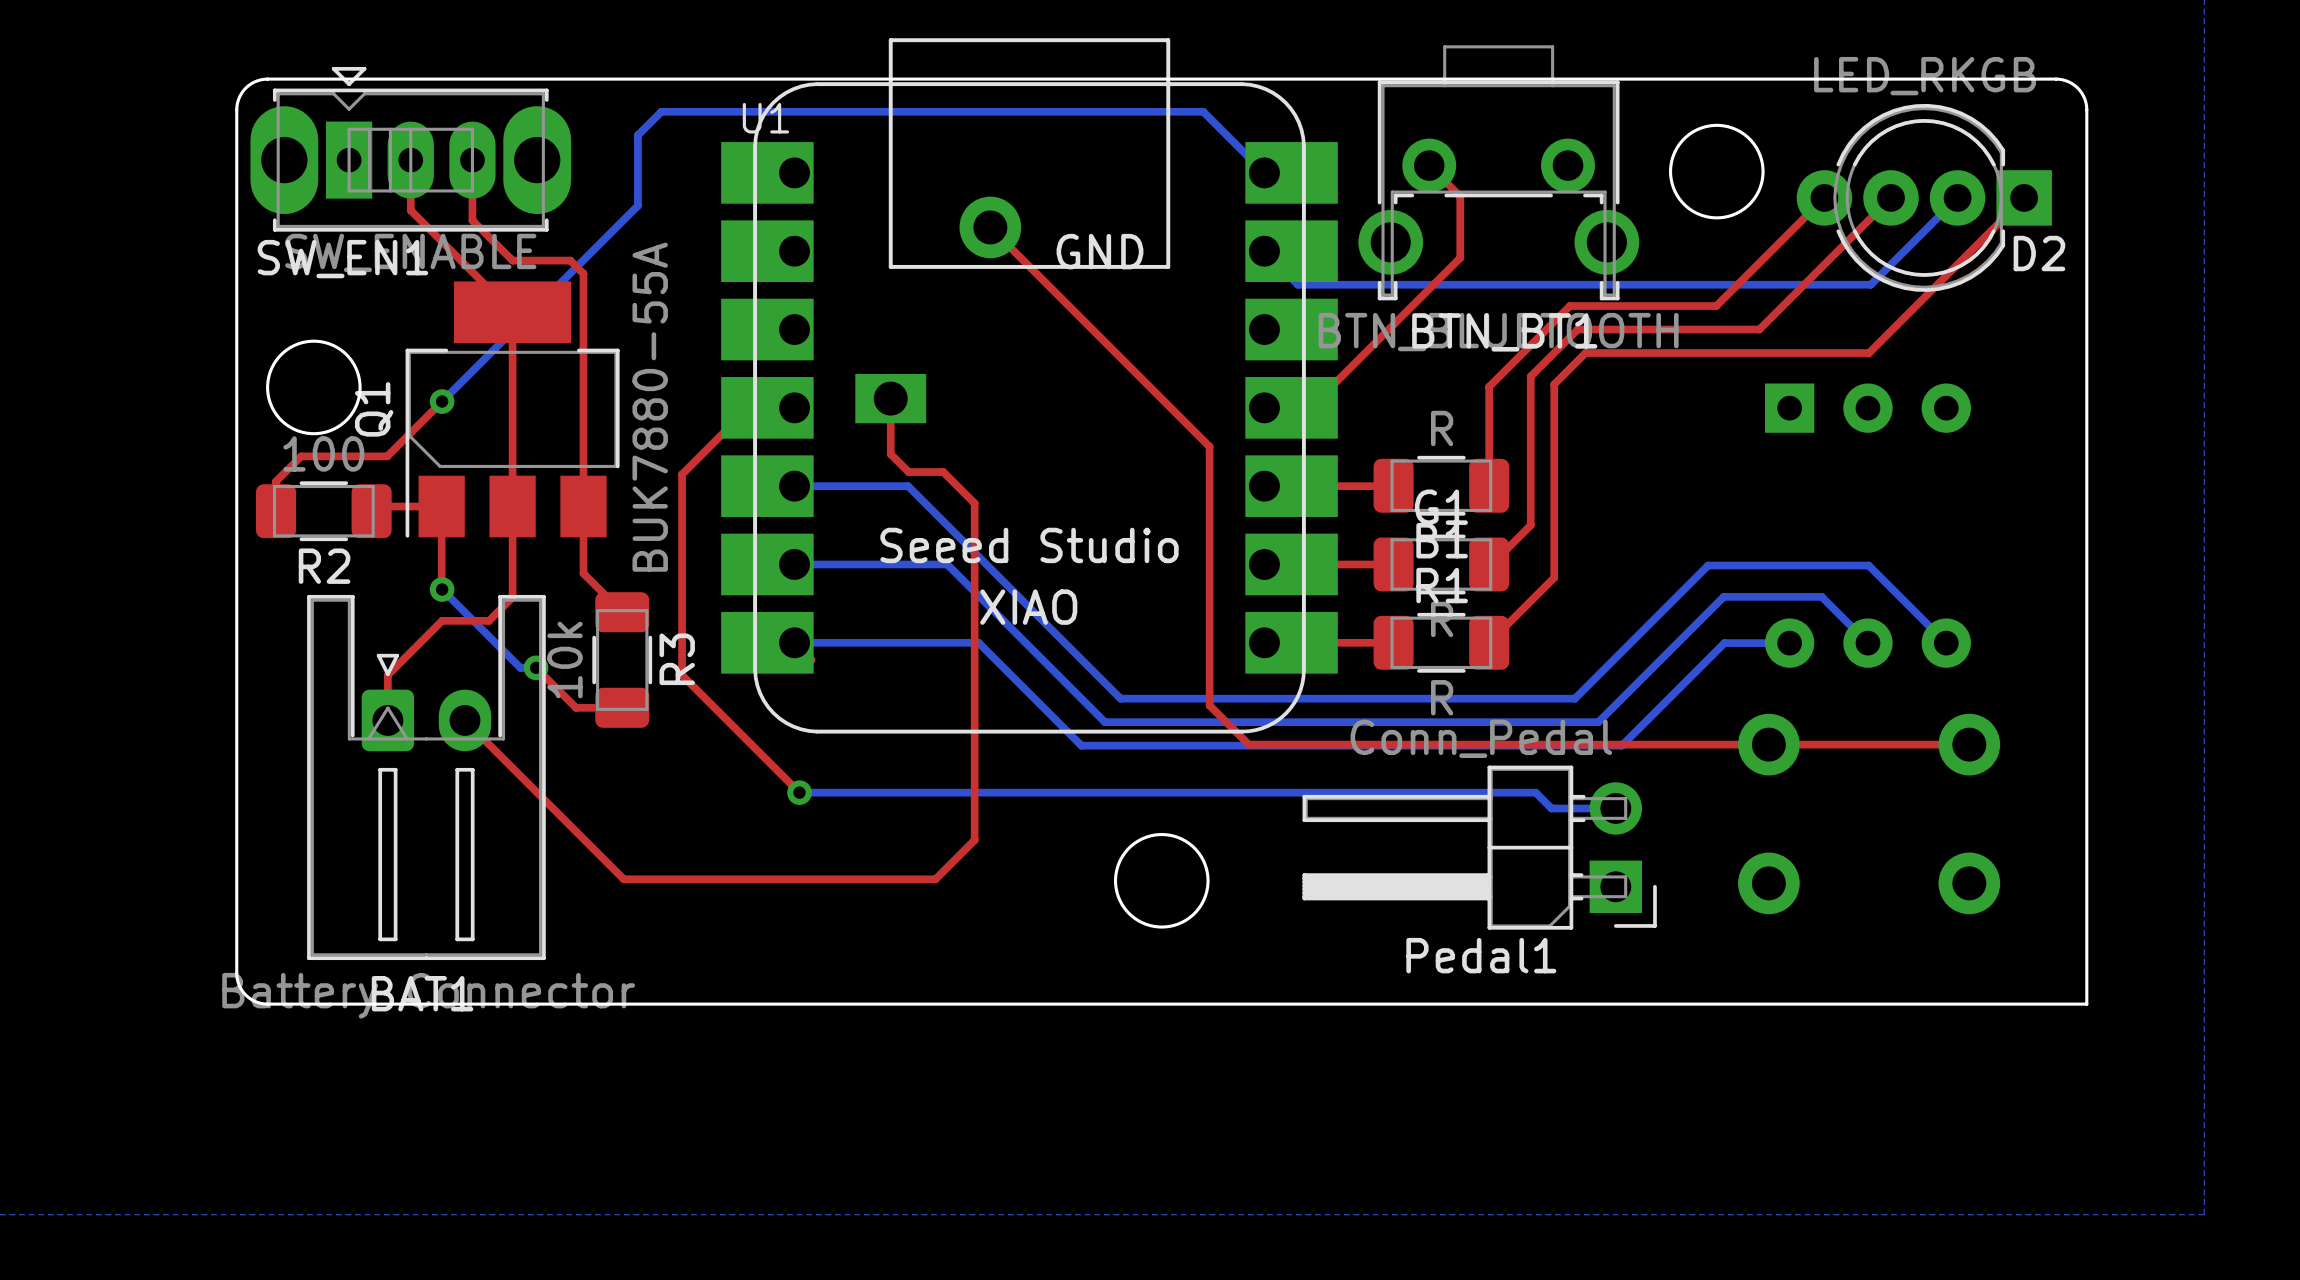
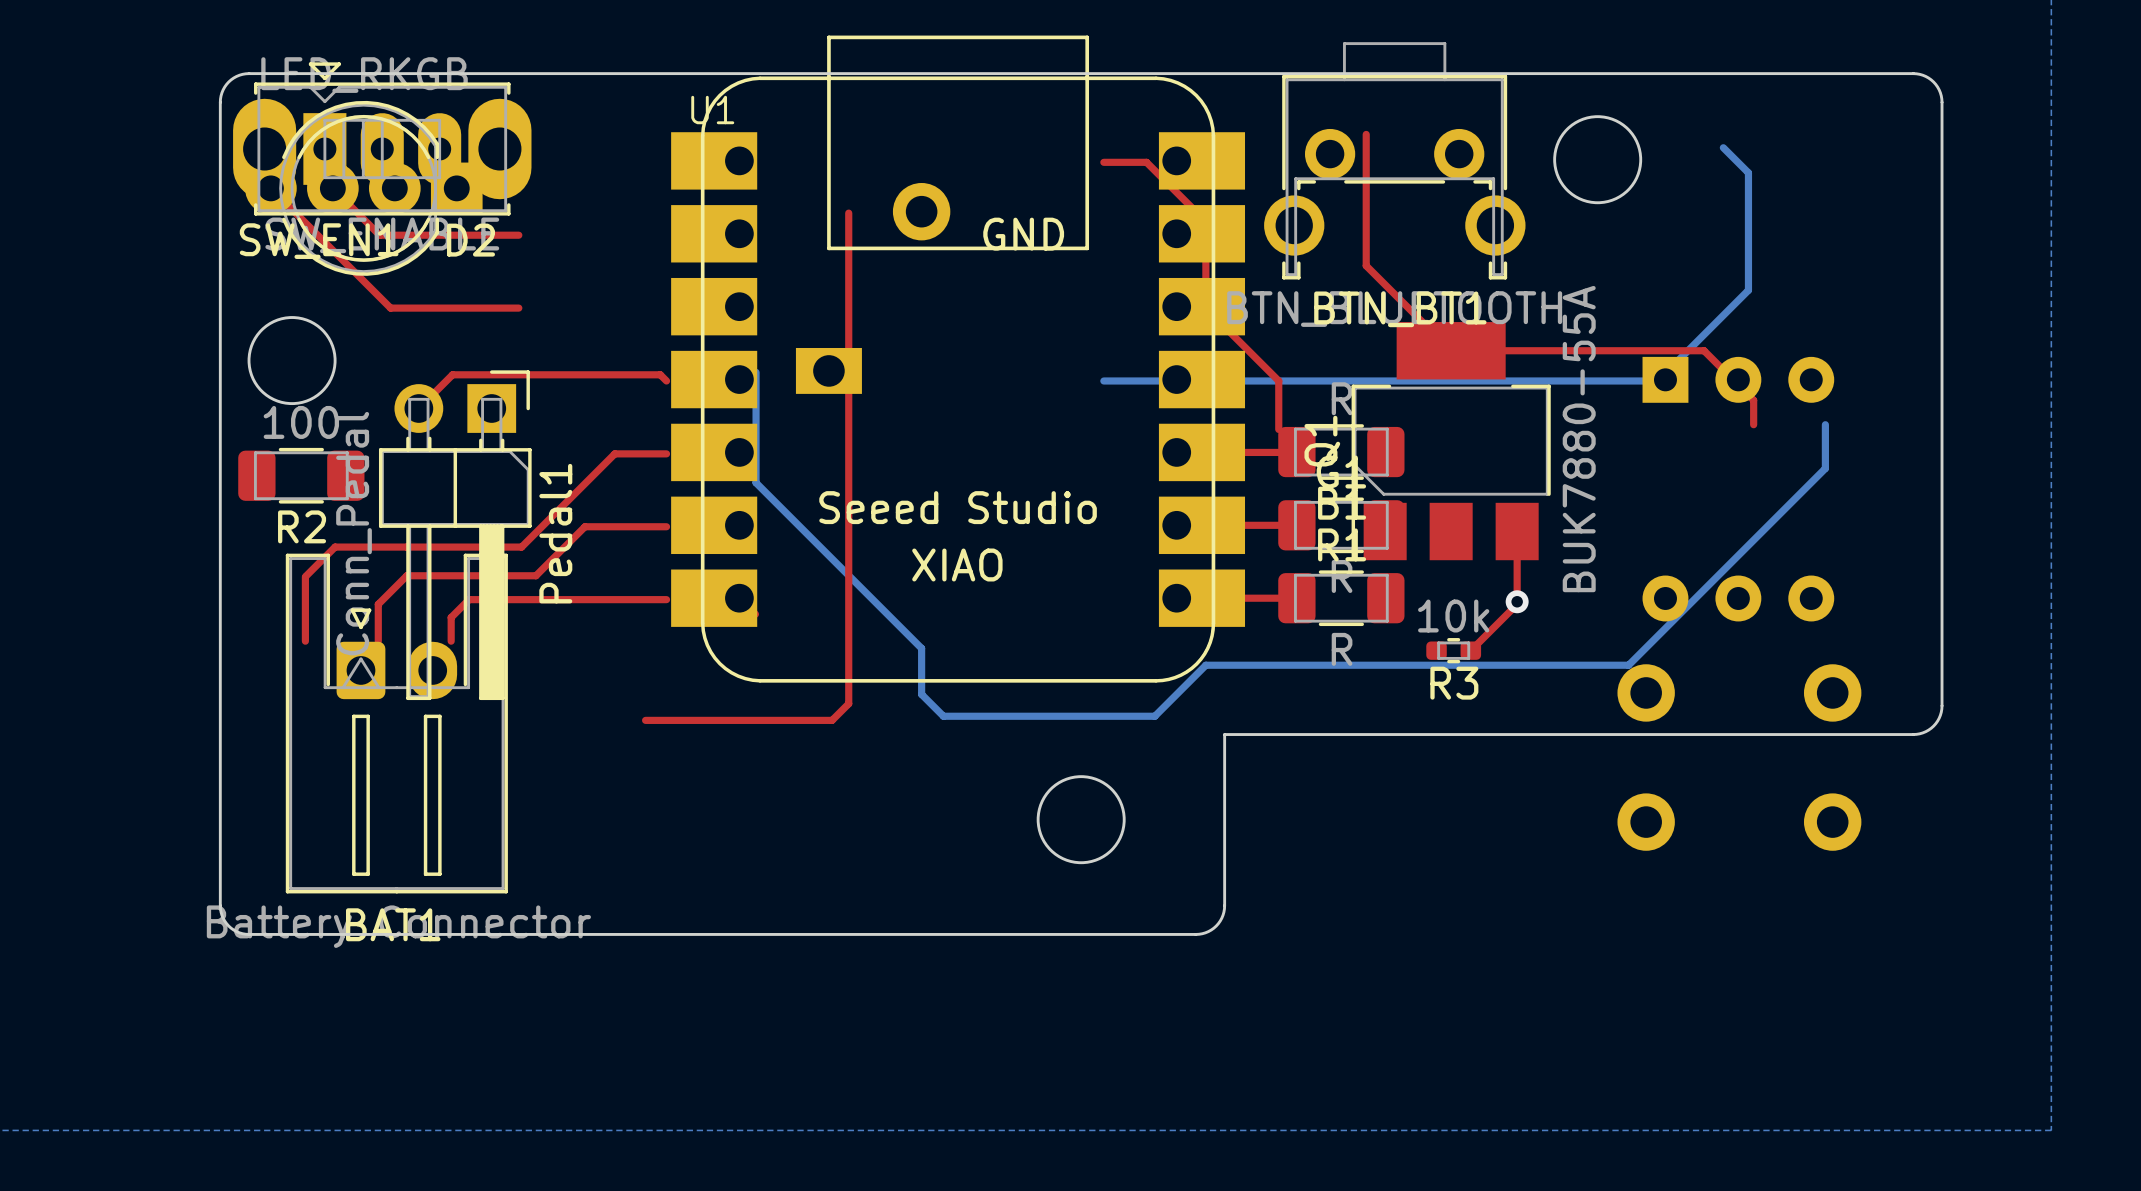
top track: none -> (1366, 134) (1366, 265) (1451, 350) (1704, 350) (1753, 400) (1753, 424)
bottom track: none -> (1723, 147) (1748, 172) (1748, 290) (1657, 380) (1103, 380)
top track: (410, 160) (410, 210) (512, 312) (512, 597) (489, 620) (442, 620) (387, 675) (387, 720) -> none
top track: (472, 160) (472, 220) (512, 260) (570, 260) (583, 273) (583, 573) (622, 612) -> none
top track: (1429, 165) (1460, 196) (1460, 257) (1310, 407) (1264, 407) -> none
bottom track: (1264, 172) (1203, 111) (661, 111) (637, 135) (637, 205) (442, 401) -> none
top track: none -> (1103, 162) (1146, 162) (1205, 221) (1205, 308) (1278, 380) (1278, 429)
top track: (1824, 197) (1716, 306) (1569, 306) (1489, 386) (1489, 485) -> none
top track: (1891, 197) (1759, 329) (1577, 329) (1530, 376) (1530, 525) (1491, 564) (1489, 564) -> none
D2 position: (1924, 197) -> (363, 188)
bottom track: (1957, 197) (1870, 284) (1297, 284) (1264, 251) -> none
top track: (2024, 197) (1869, 353) (1585, 353) (1554, 384) (1554, 577) (1489, 642) -> none
top track: none -> (270, 188) (390, 308) (518, 308)
top track: none -> (332, 188) (379, 235) (518, 235)
top track: (990, 227) (1209, 446) (1209, 705) (1248, 744) (1969, 744) -> none
top track: none -> (848, 213) (848, 703) (832, 720) (645, 720)
top track: (890, 398) (890, 454) (908, 472) (943, 472) (974, 503) (974, 840) (935, 879) (623, 879) (464, 720) -> none
bottom track: none -> (756, 372) (756, 482) (921, 648) (921, 694) (943, 716) (1154, 716) (1205, 665) (1628, 665) (1825, 468) (1825, 424)
top track: (442, 401) (387, 456) (301, 456) (276, 481) (276, 511) -> none
via: (442, 401) -> none
top track: (794, 407) (748, 407) (682, 474) (682, 675) (799, 792) -> none
Q1 position: (512, 409) -> (1451, 441)
top track: none -> (666, 380) (660, 374) (452, 374) (418, 408)
bottom track: (794, 486) (908, 486) (1120, 698) (1574, 698) (1708, 565) (1868, 565) (1946, 643) -> none
top track: none -> (666, 453) (614, 453) (521, 547) (335, 547) (306, 575)
top track: (371, 511) (376, 506) (441, 506) (441, 589) -> none
bottom track: (794, 564) (947, 564) (1104, 722) (1598, 722) (1723, 596) (1821, 596) (1867, 643) -> none
top track: none -> (666, 526) (584, 526) (535, 575) (406, 575) (378, 604) (378, 641)
top track: none -> (1517, 531) (1517, 604) (1470, 650)
bottom track: (442, 589) (520, 667) (536, 667) -> none
via: (442, 589) -> none
R3 footprint: [592, 592, 653, 728] -> [1426, 638, 1482, 664]
top track: none -> (305, 576) (305, 641)
bottom track: (794, 642) (978, 642) (1081, 745) (1621, 745) (1724, 643) (1789, 643) -> none
top track: none -> (666, 599) (469, 599) (451, 617) (451, 641)
via: none -> (1517, 601)
R3 name position: R3 (677, 659) -> R3 (1454, 683)
R3 value position: 10k (564, 660) -> 10k (1453, 616)
top track: (536, 667) (576, 707) (622, 707) -> none
via: (536, 667) -> none
board edge: (2086, 758) (2086, 1004) (1285, 1004) -> (1942, 705) (1939, 718) (1933, 726) (1925, 731) (1913, 734) (1224, 734) (1224, 908) (1220, 921) (1213, 928) (1205, 932) (1195, 934)
bottom track: (799, 792) (1535, 792) (1551, 808) (1615, 808) -> none
via: (799, 792) -> none
Pedal1 rotation: 0° (1479, 847) -> 90° counterclockwise (455, 535)
Pedal1 position: (1479, 847) -> (455, 535)

